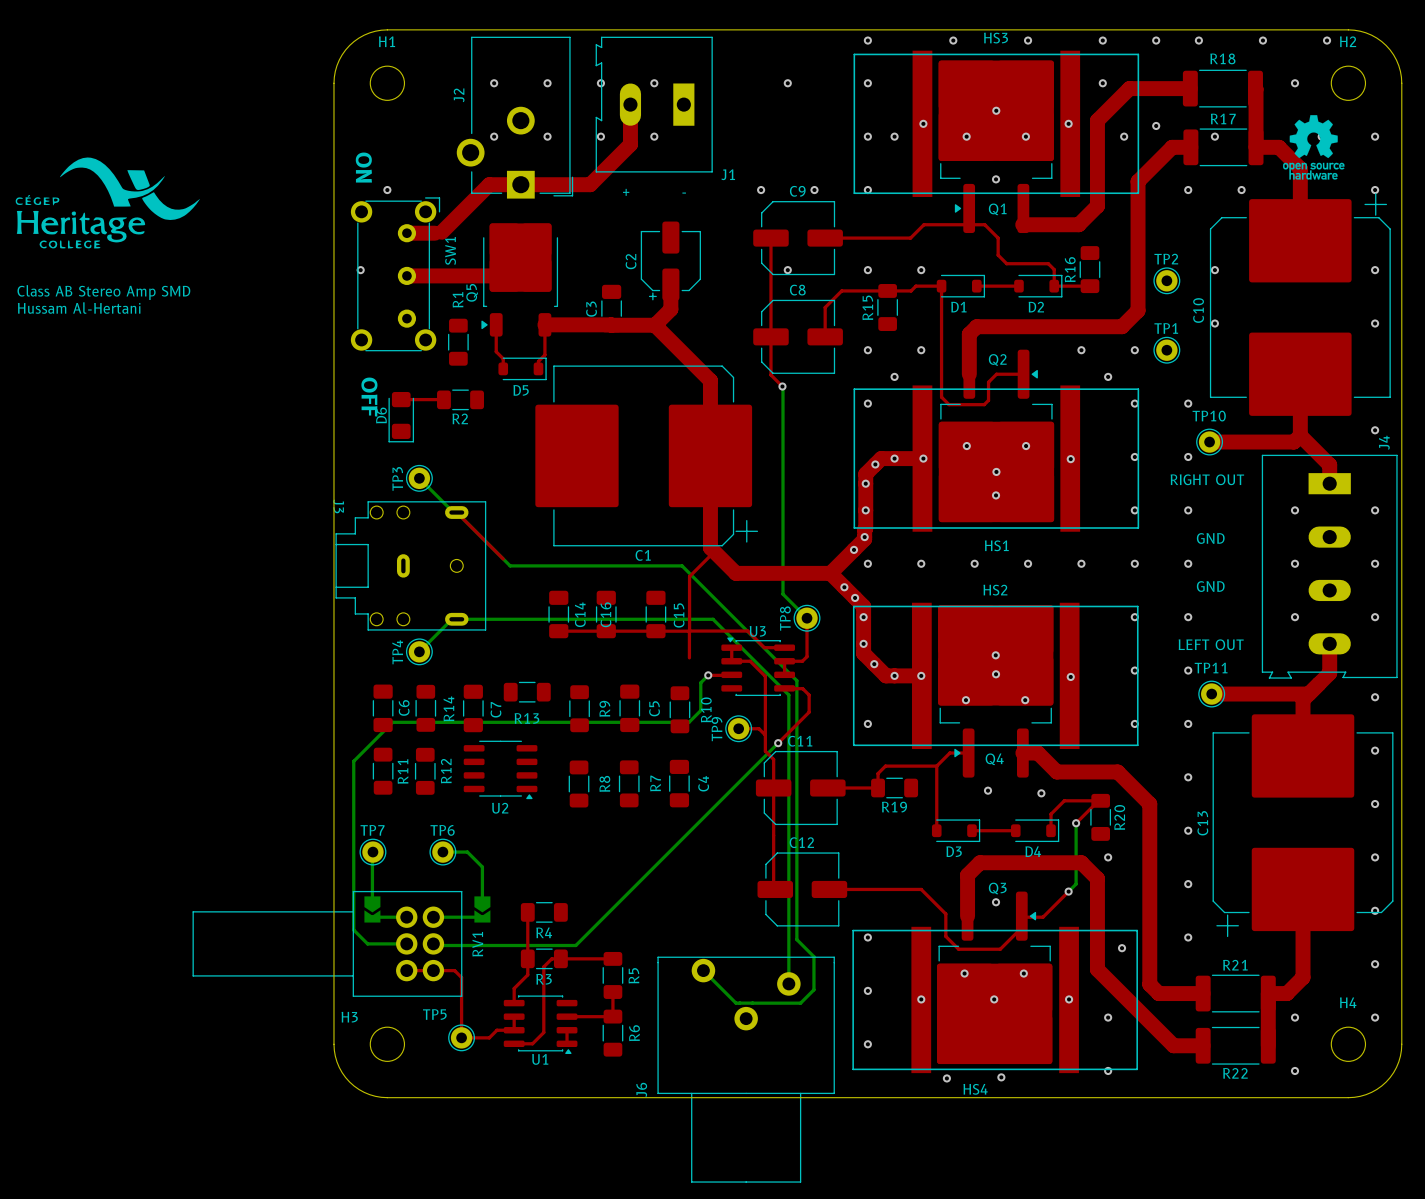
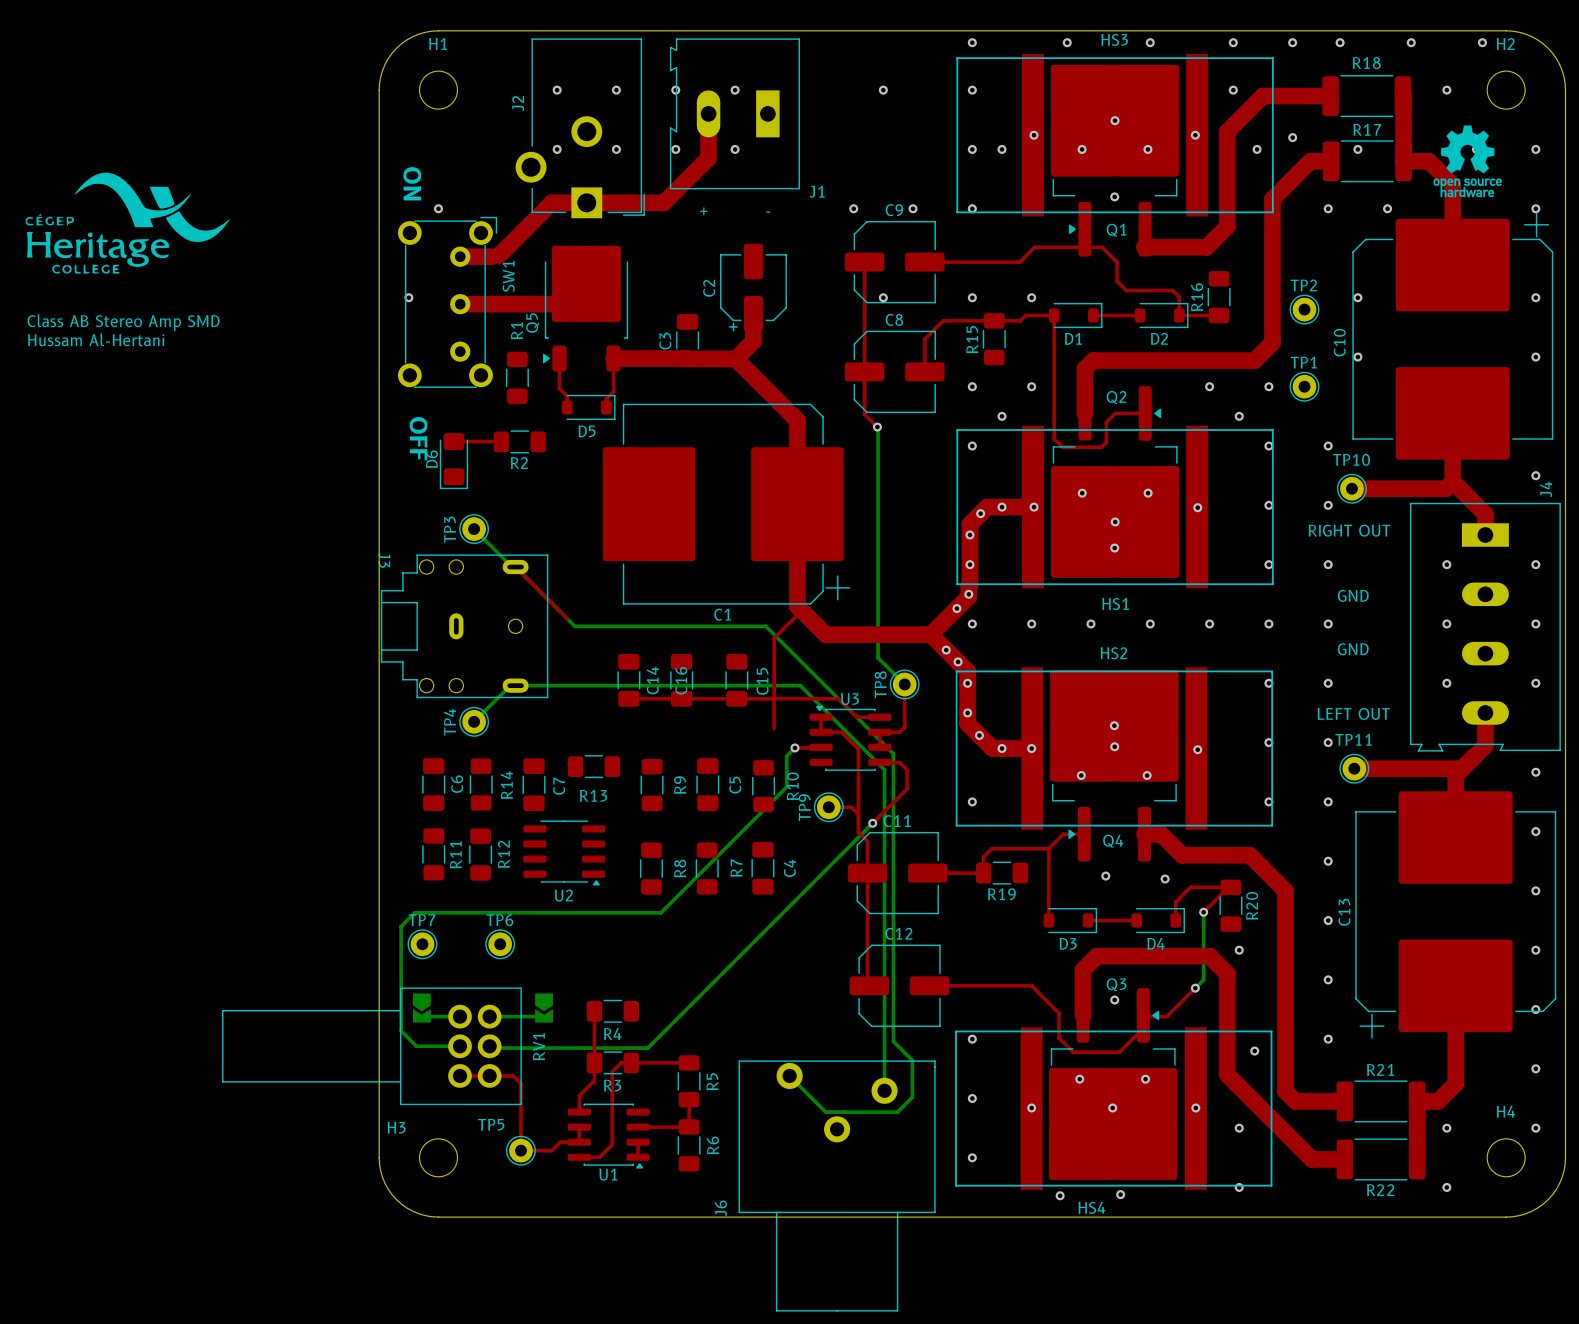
bottom track: (689, 722) (392, 722) (353, 761) (353, 836) -> (773, 800) (660, 912) (414, 912) (401, 926)
bottom track: (372, 852) (372, 901) -> none
bottom track: (442, 852) (467, 852) (482, 867) (482, 901) -> none

